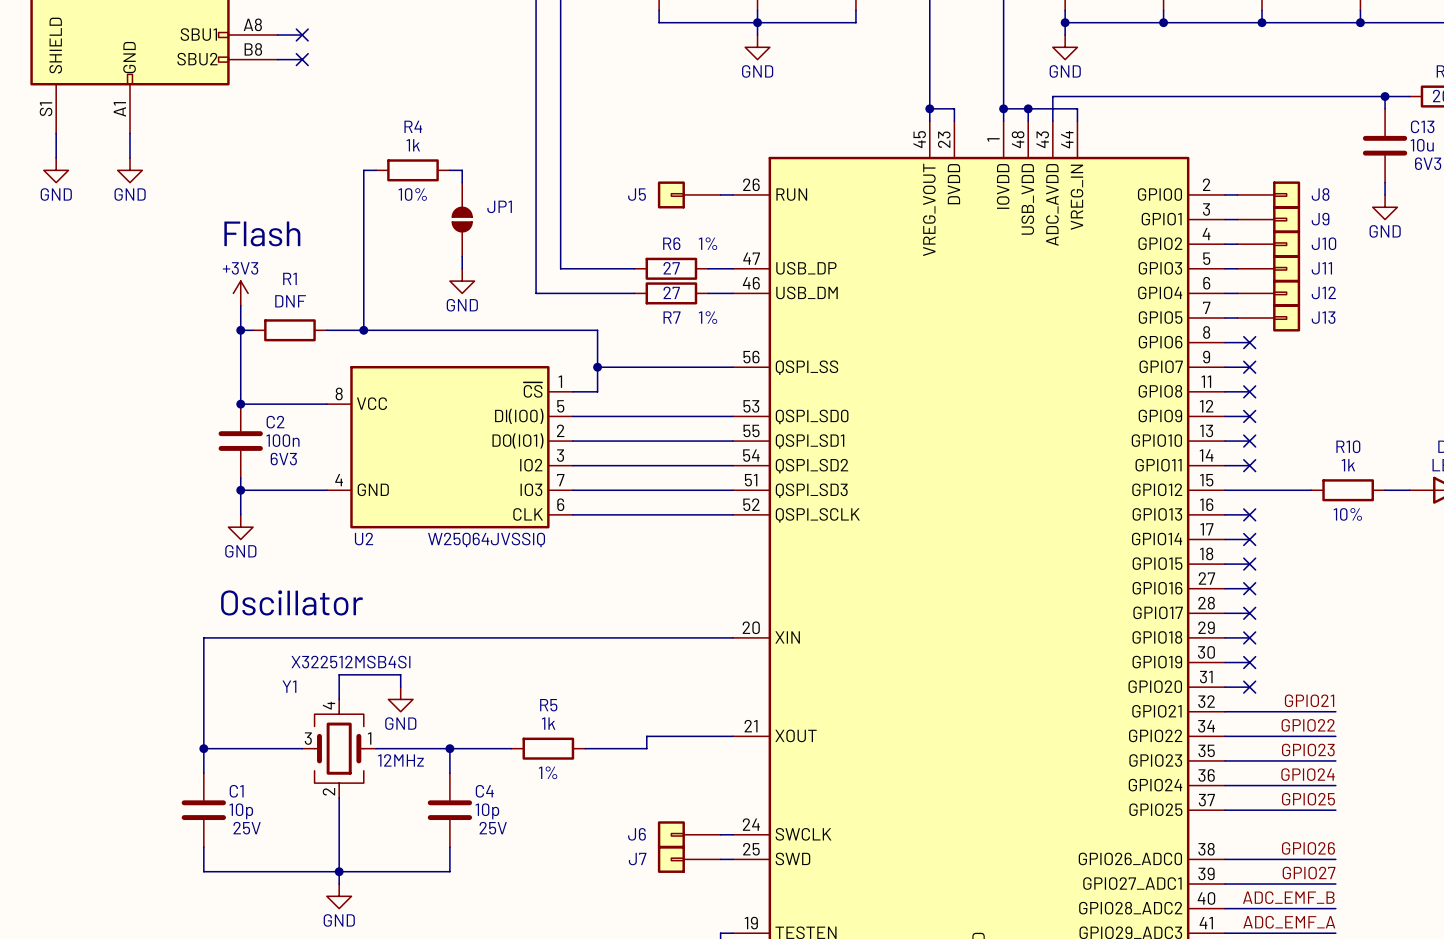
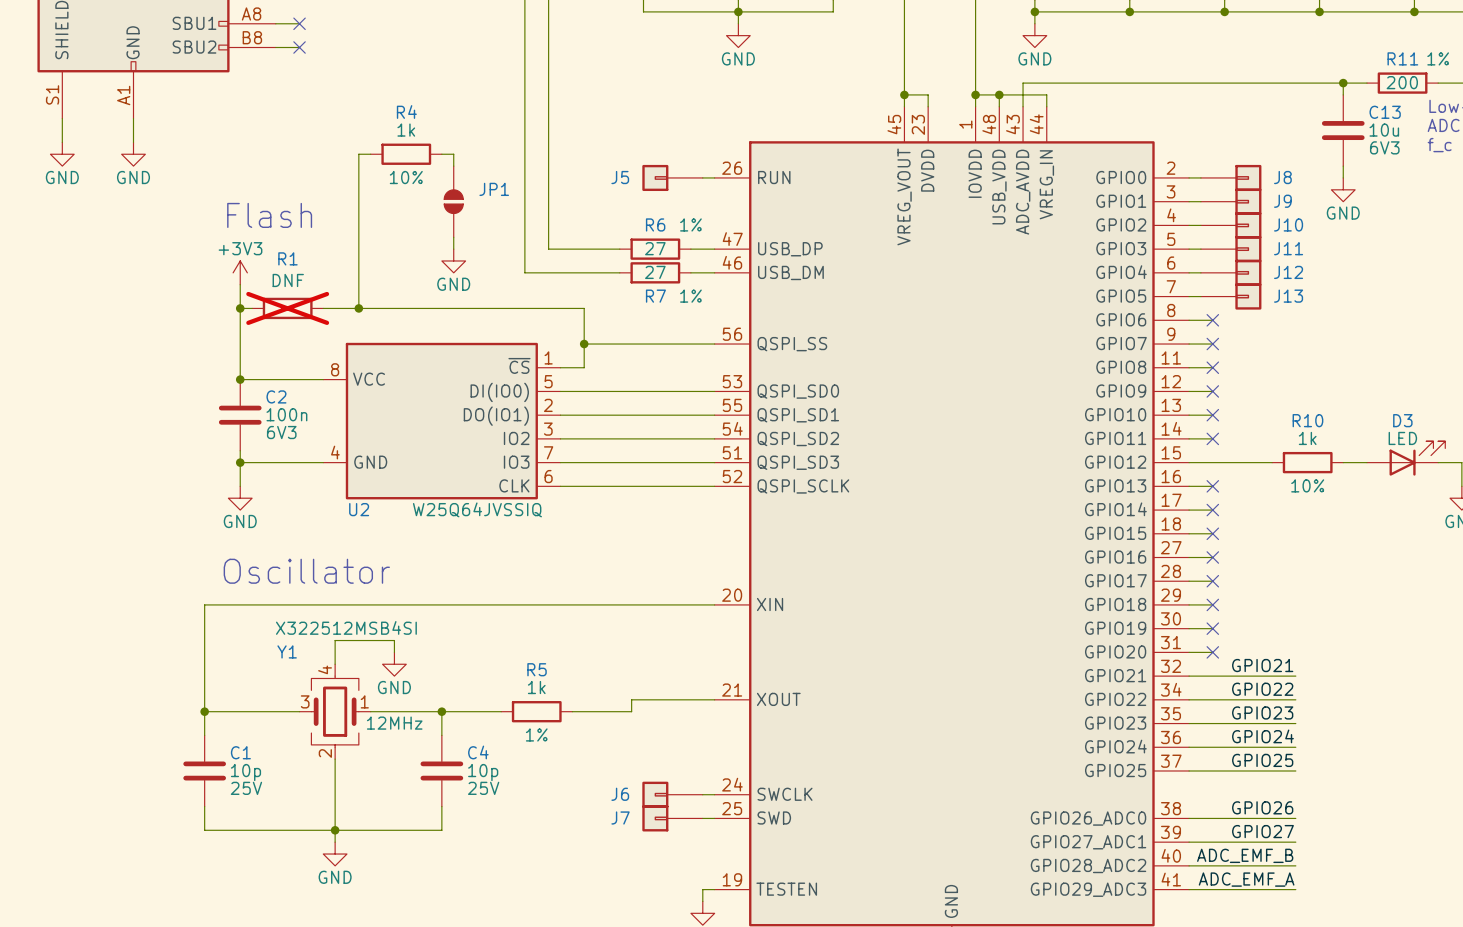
R1 do-not-place cross: none -> (287, 308)

